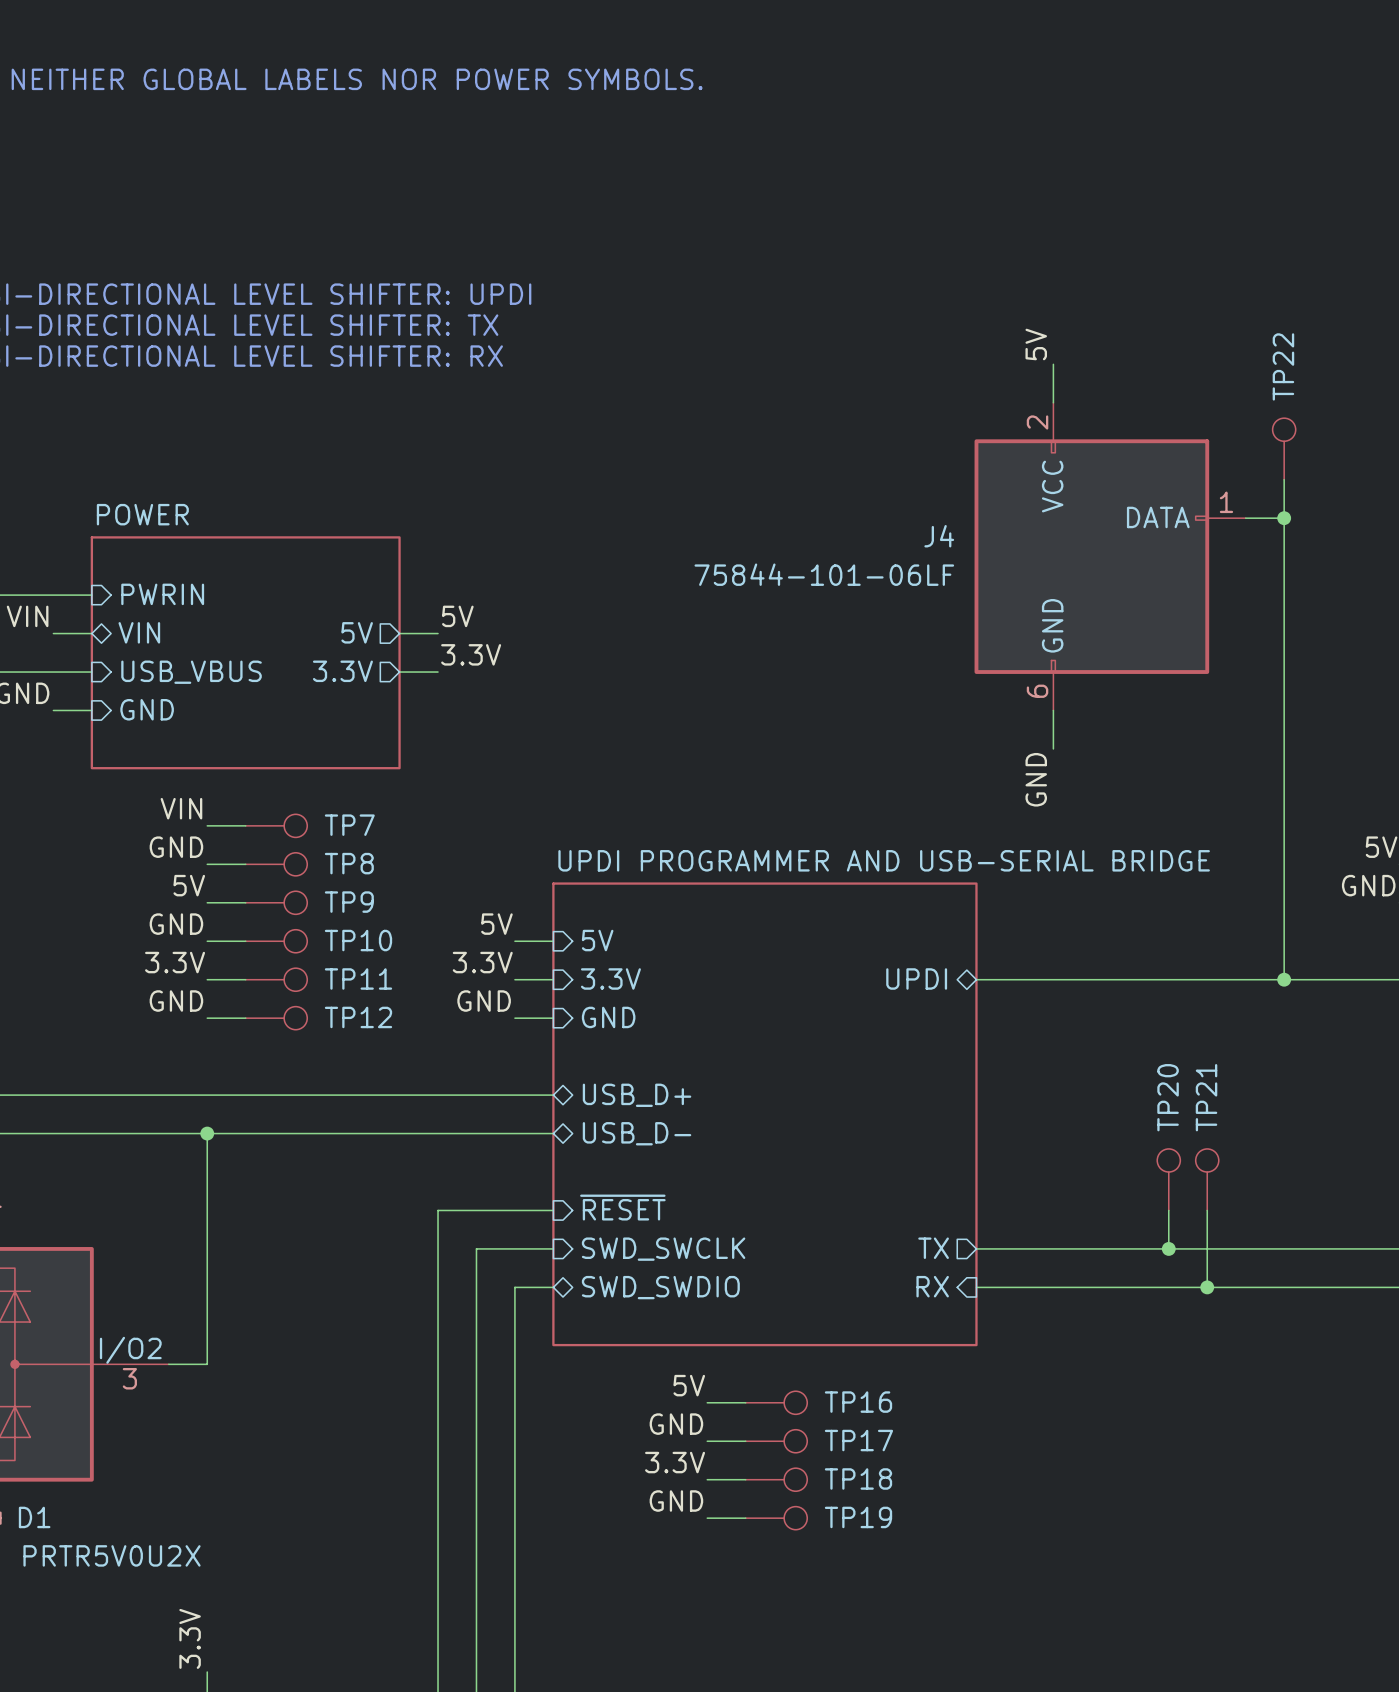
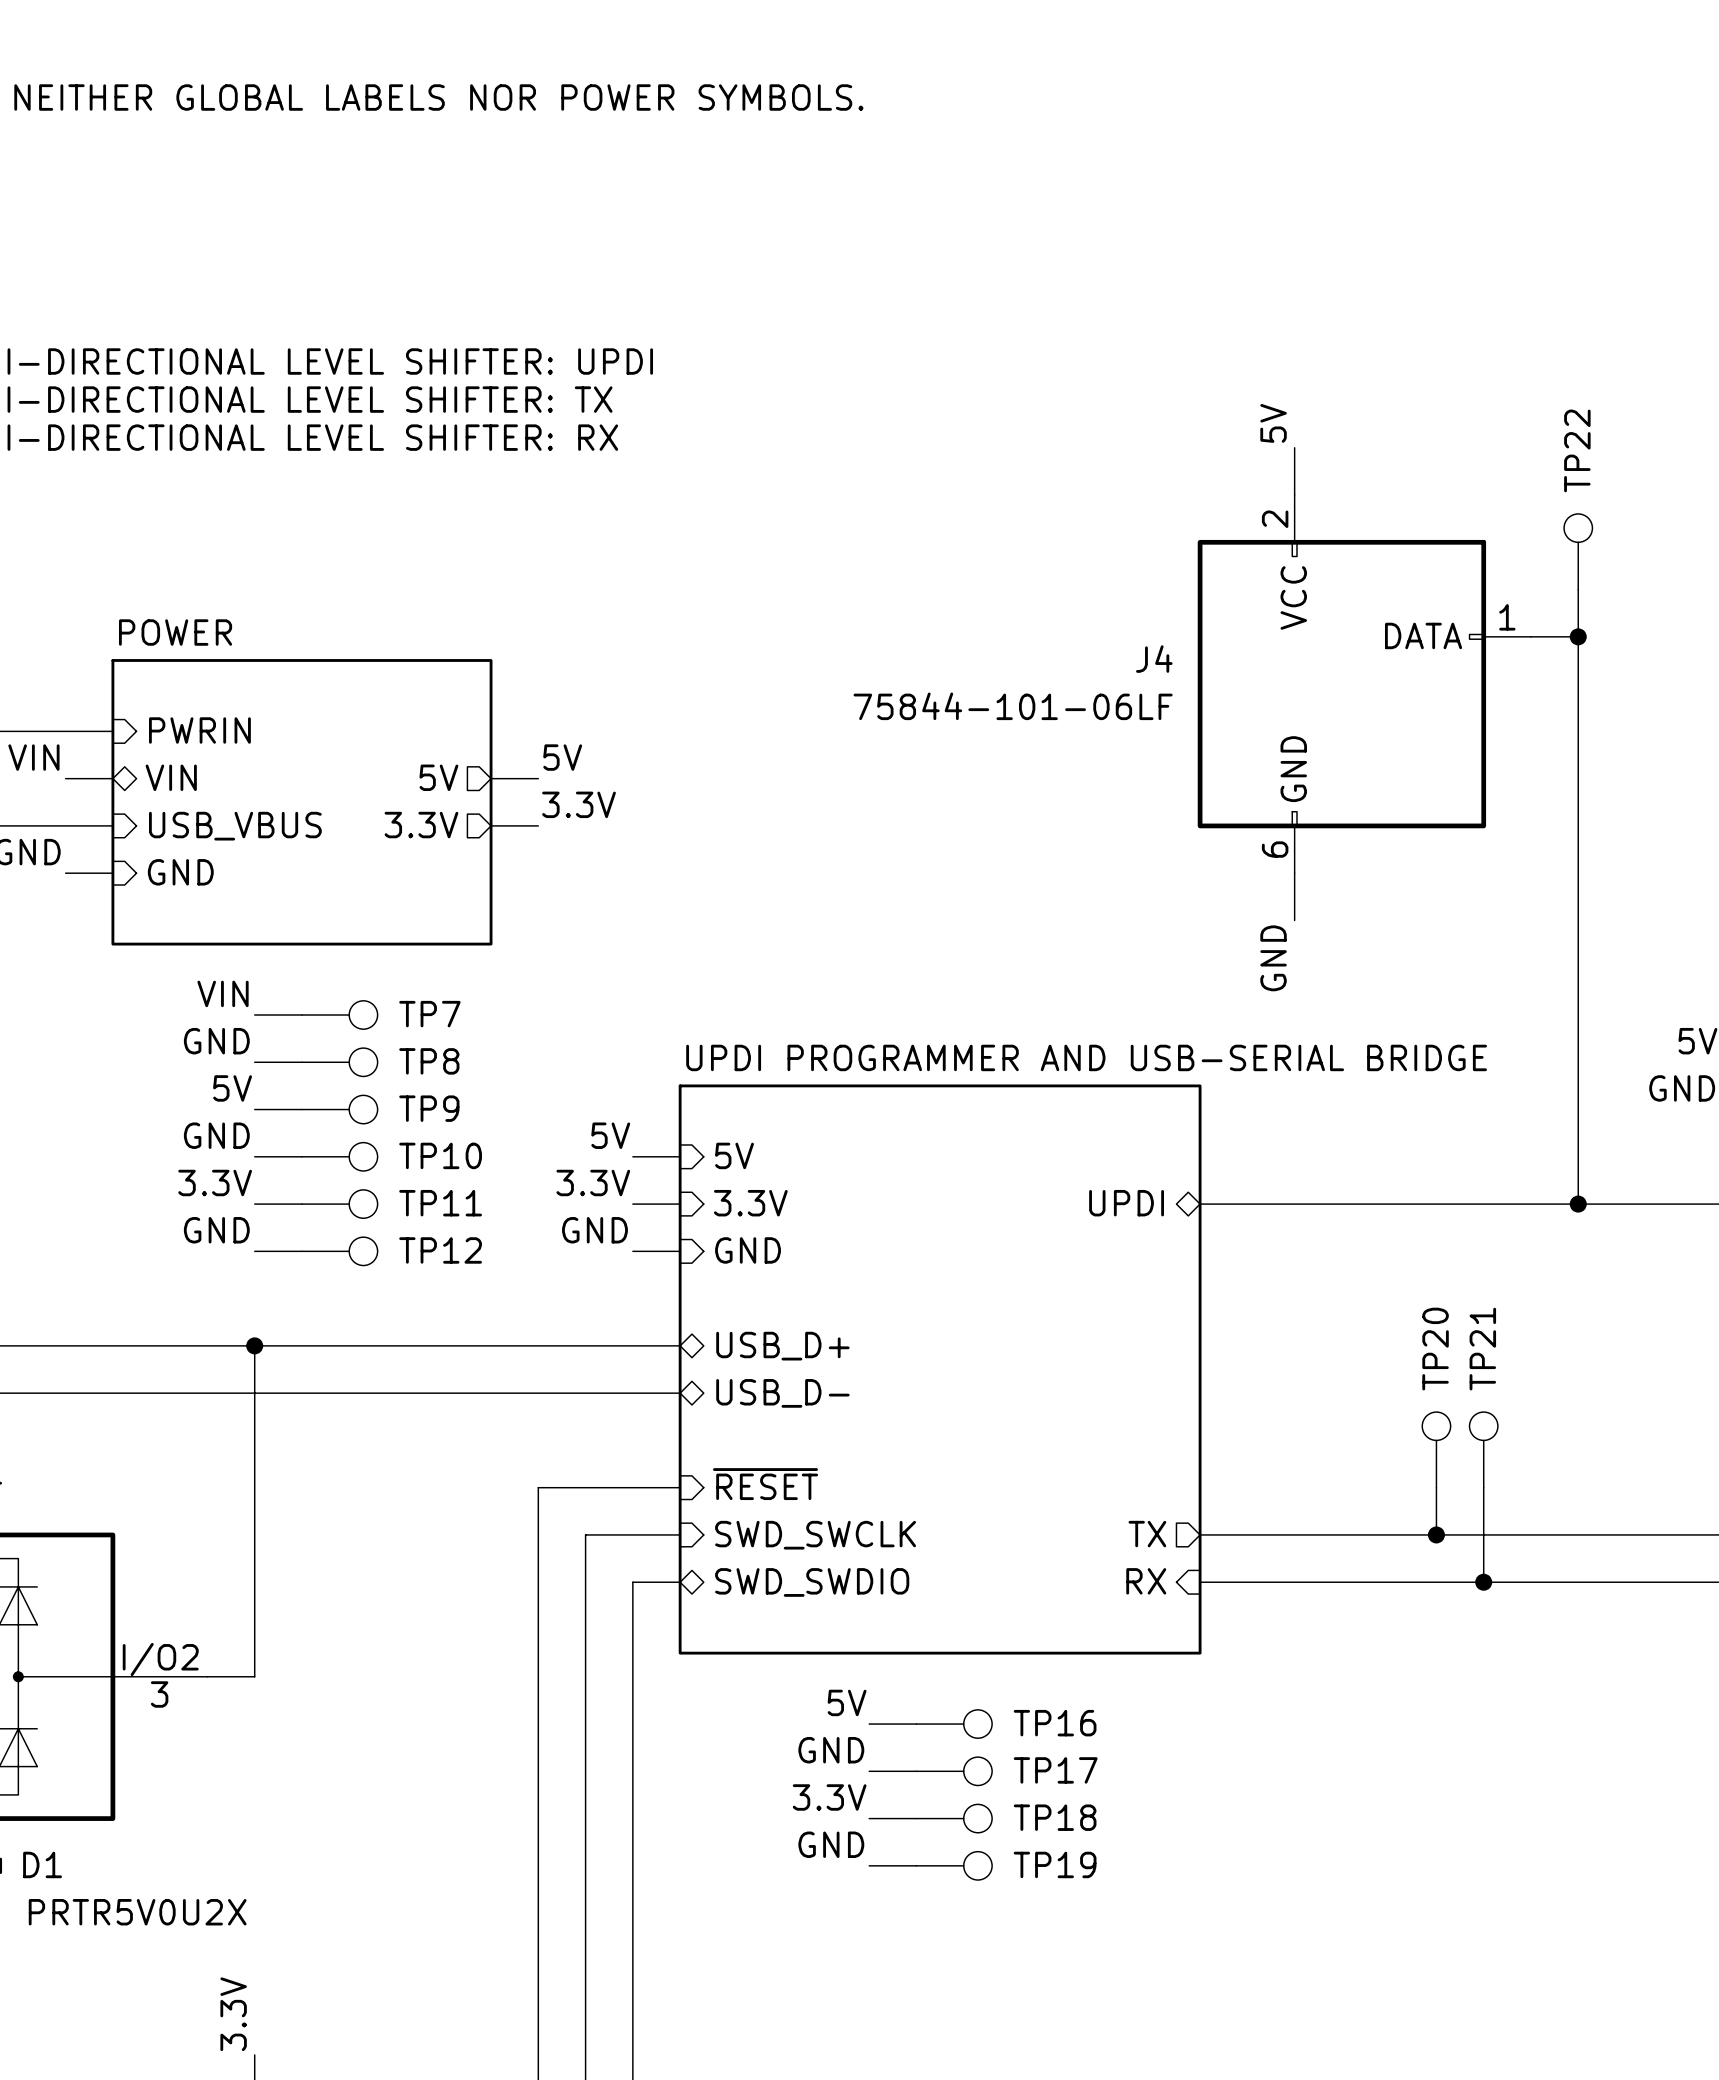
wire: none -> (254, 1345) (254, 1393)
junction position: (207, 1133) -> (254, 1345)

